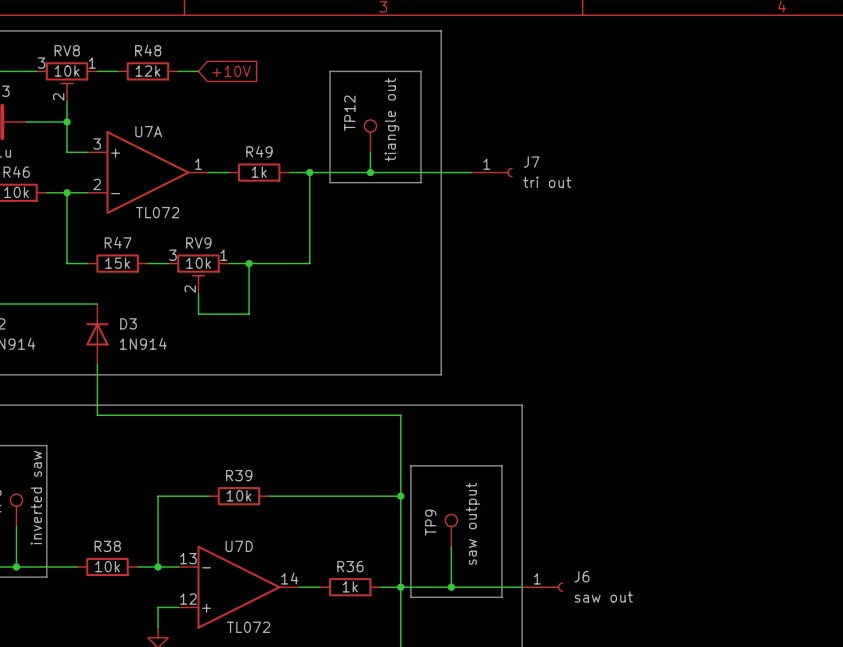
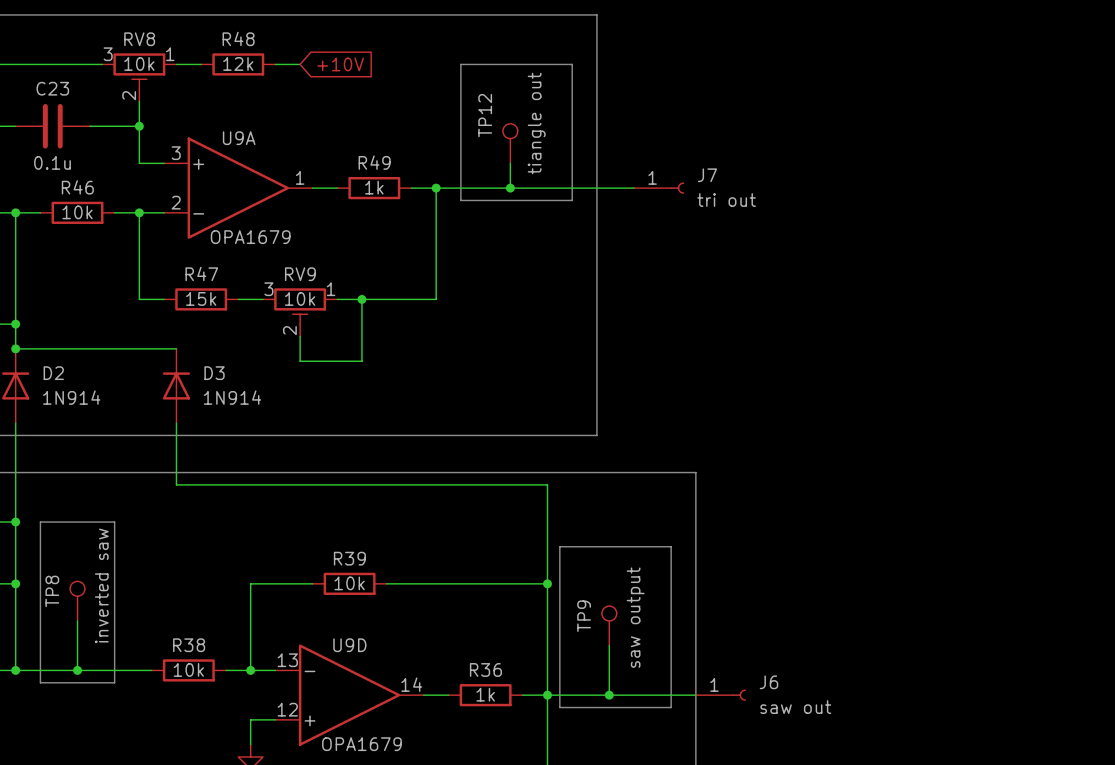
U7A name: U7A (148, 131) -> U9A (239, 138)
U7A value: TL072 (157, 212) -> OPA1679 (250, 237)
U7D name: U7D (239, 546) -> U9D (349, 645)
U7D value: TL072 (248, 627) -> OPA1679 (361, 744)

